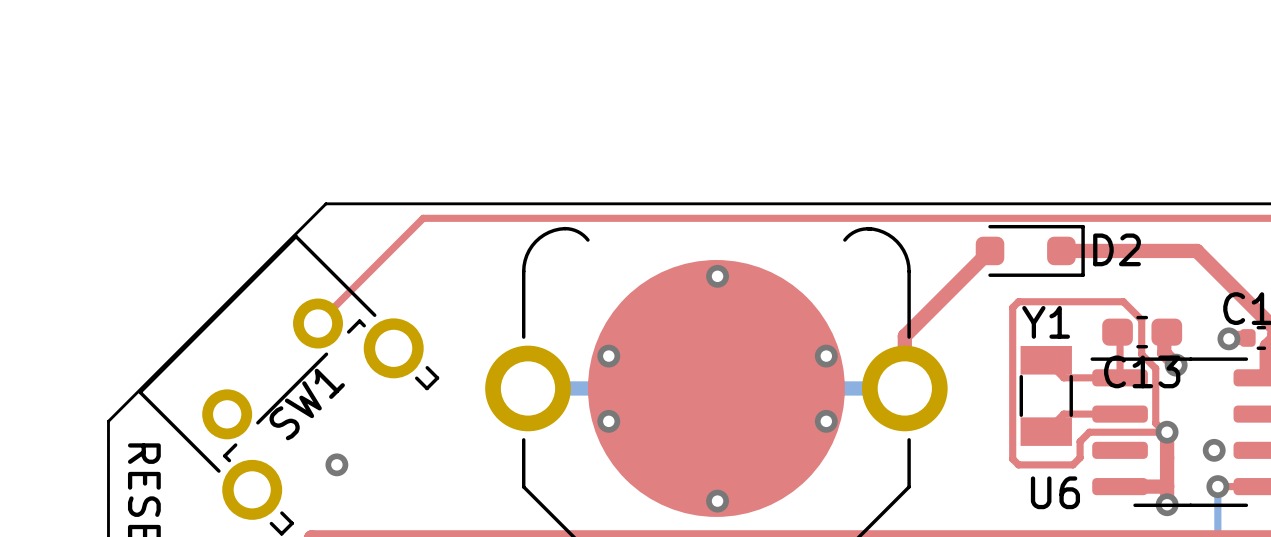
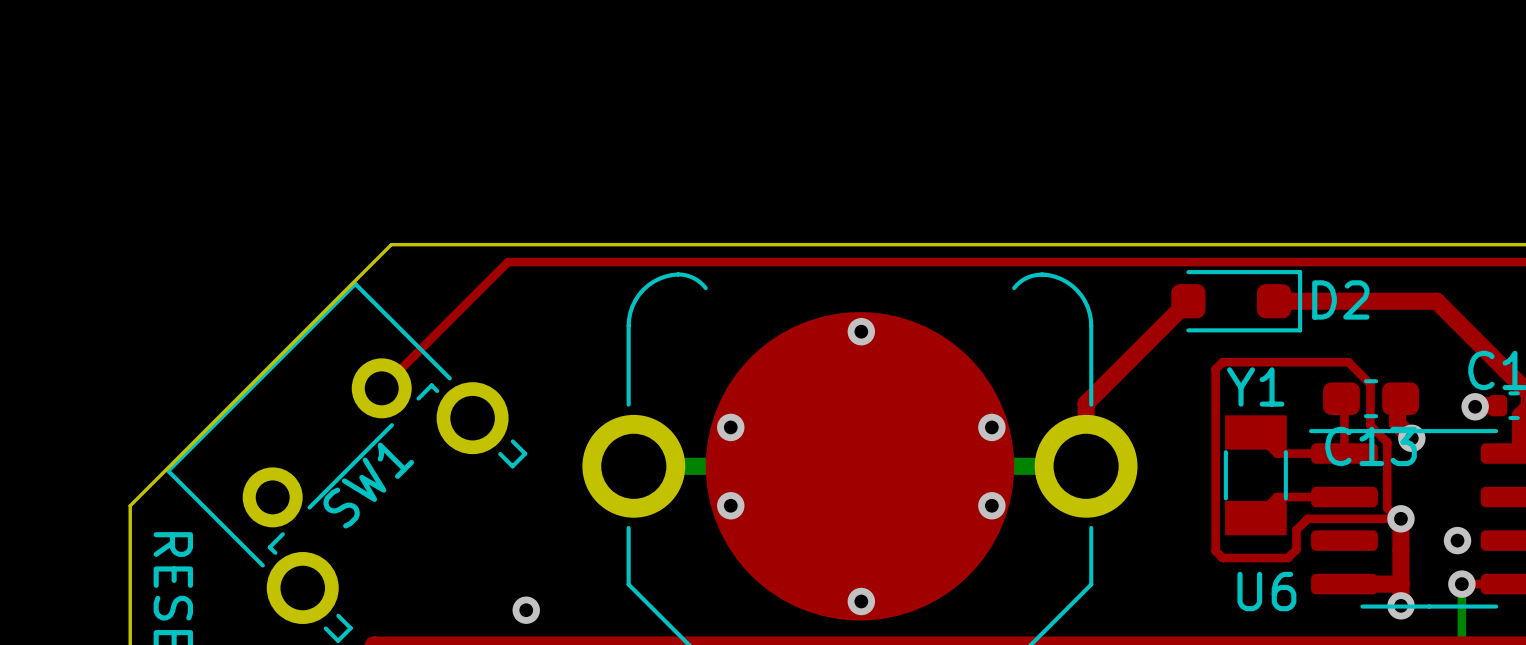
via position: (336, 464) -> (526, 610)

